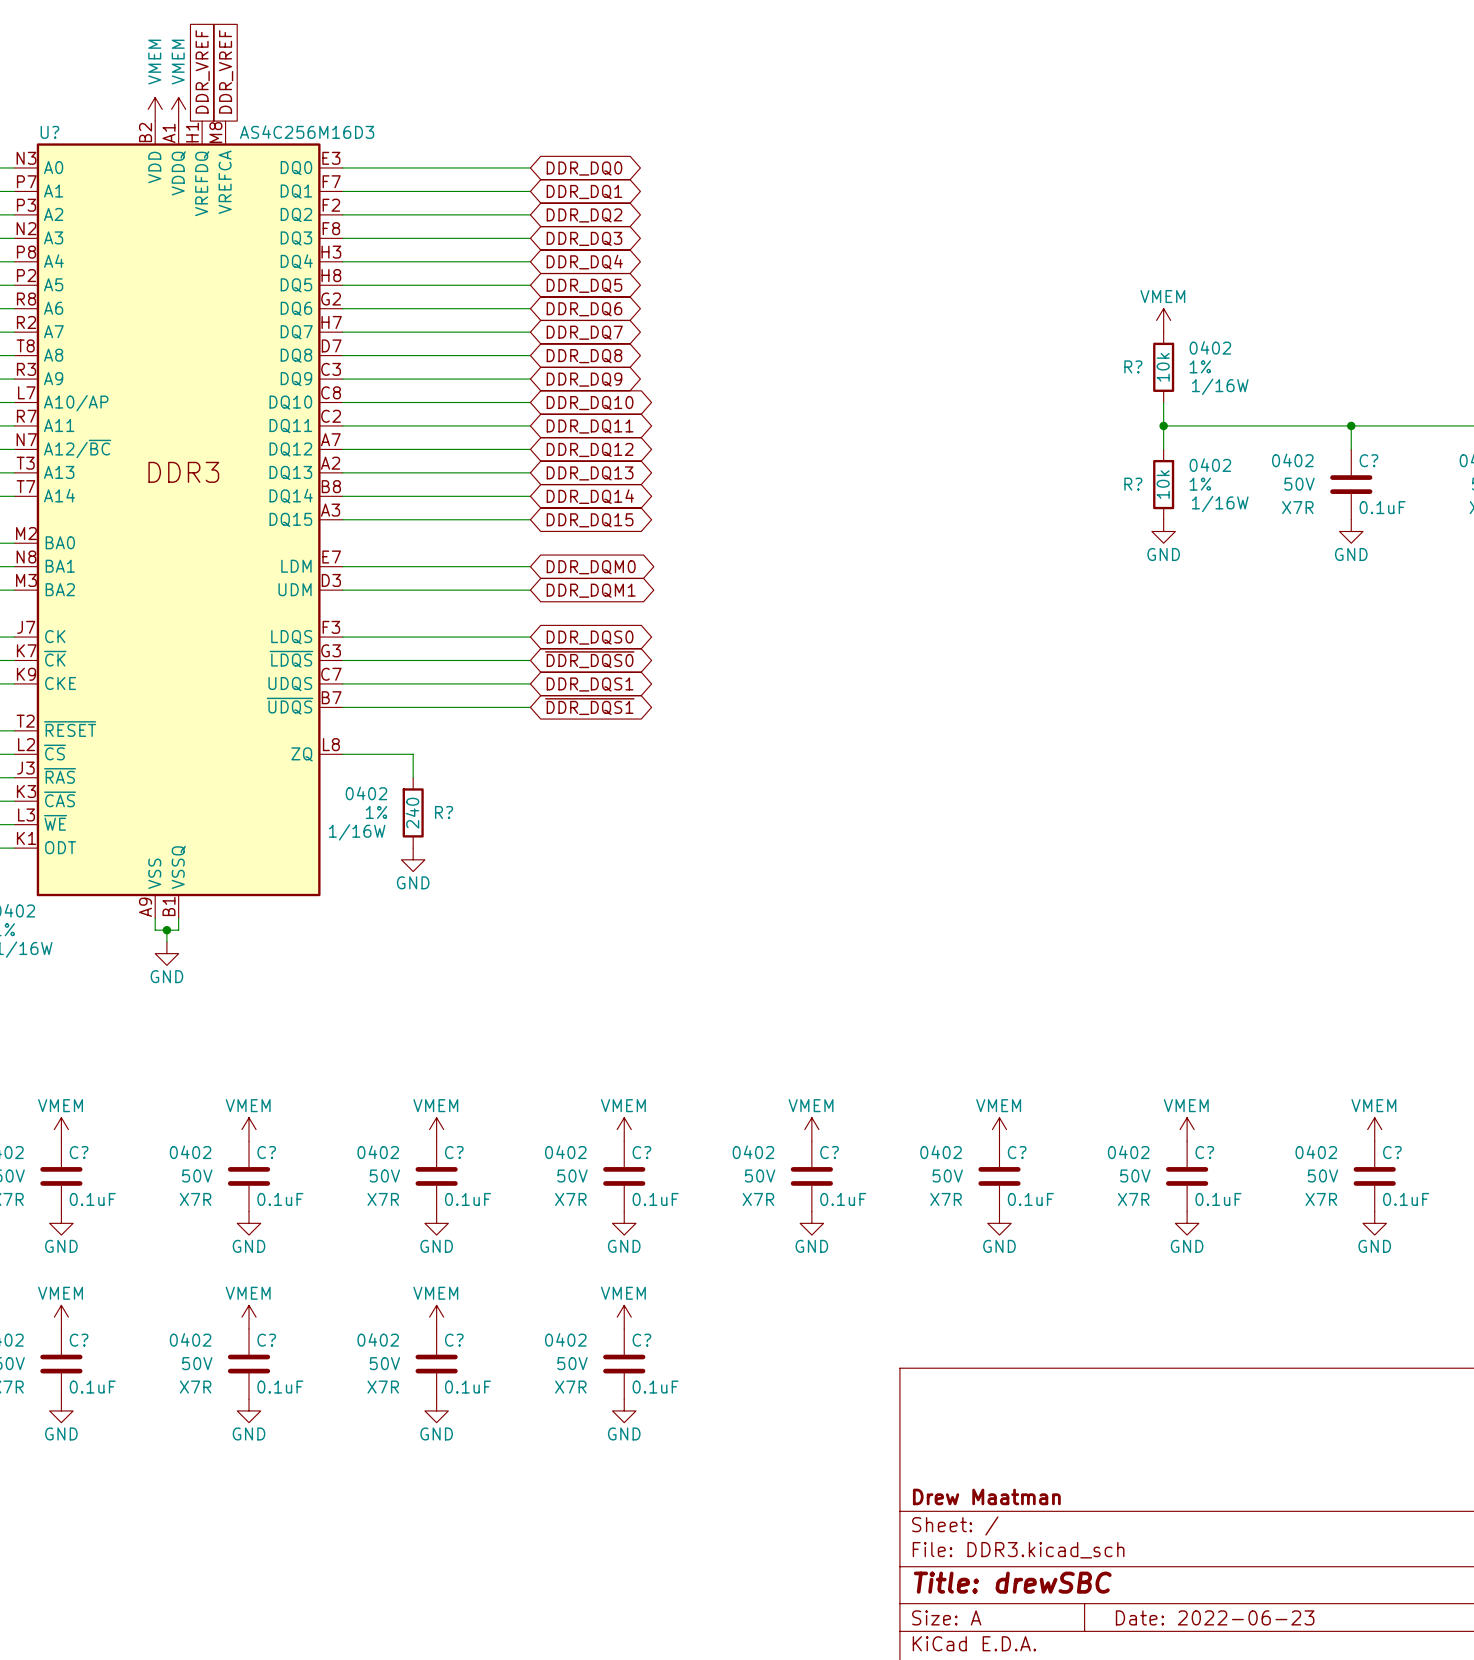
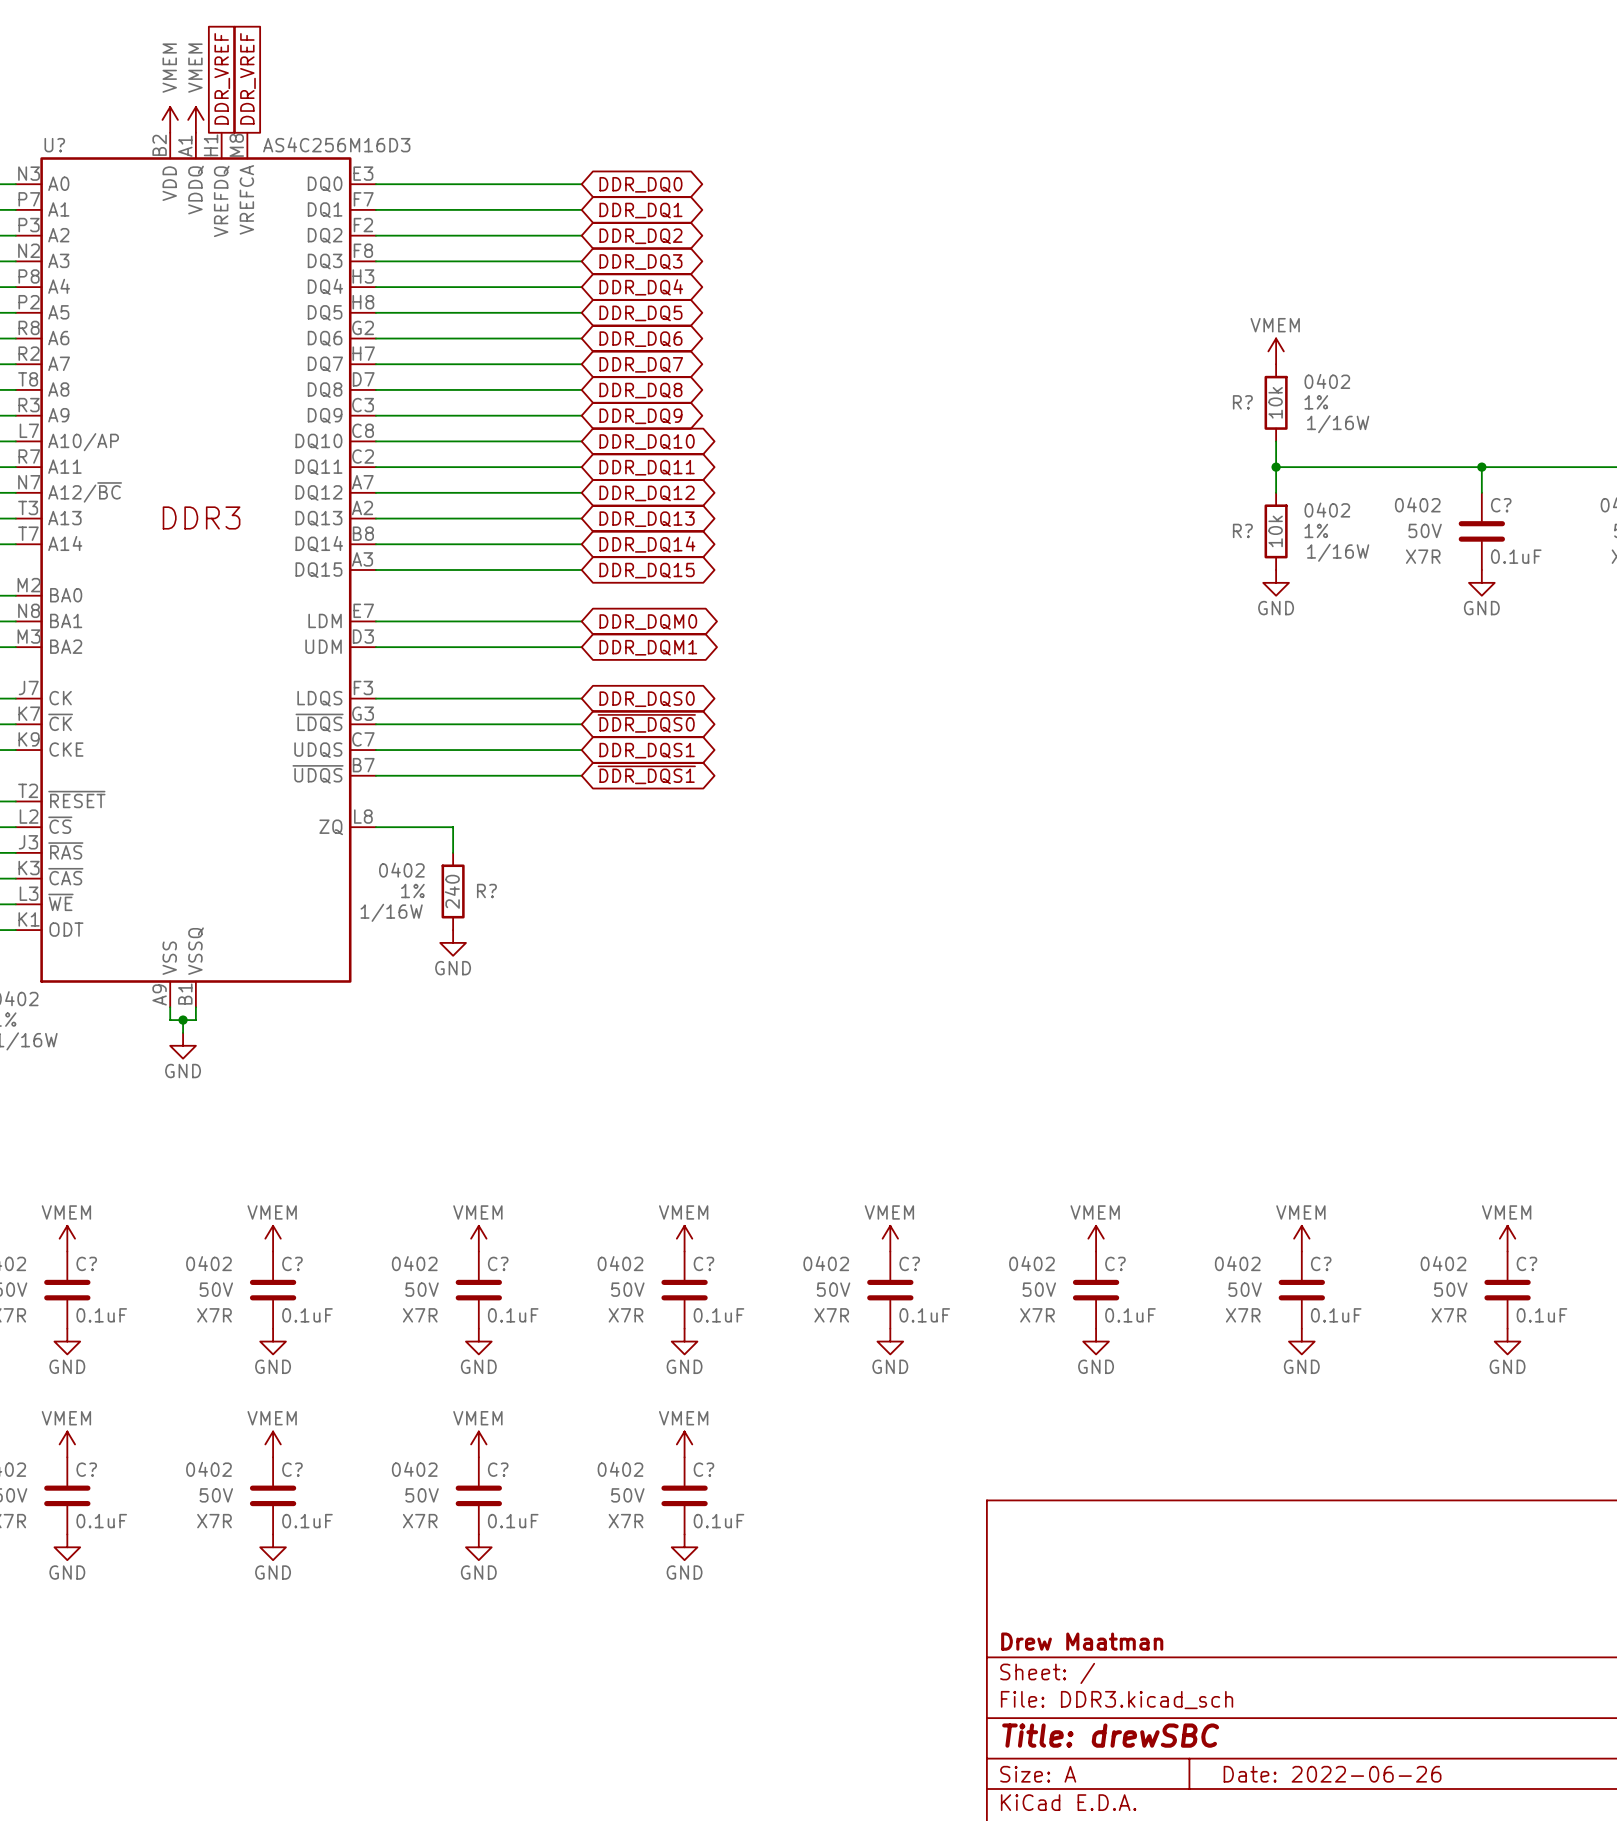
title block: Date: 2022-06-23 (1215, 1617) -> Date: 2022-06-26 (1332, 1774)

